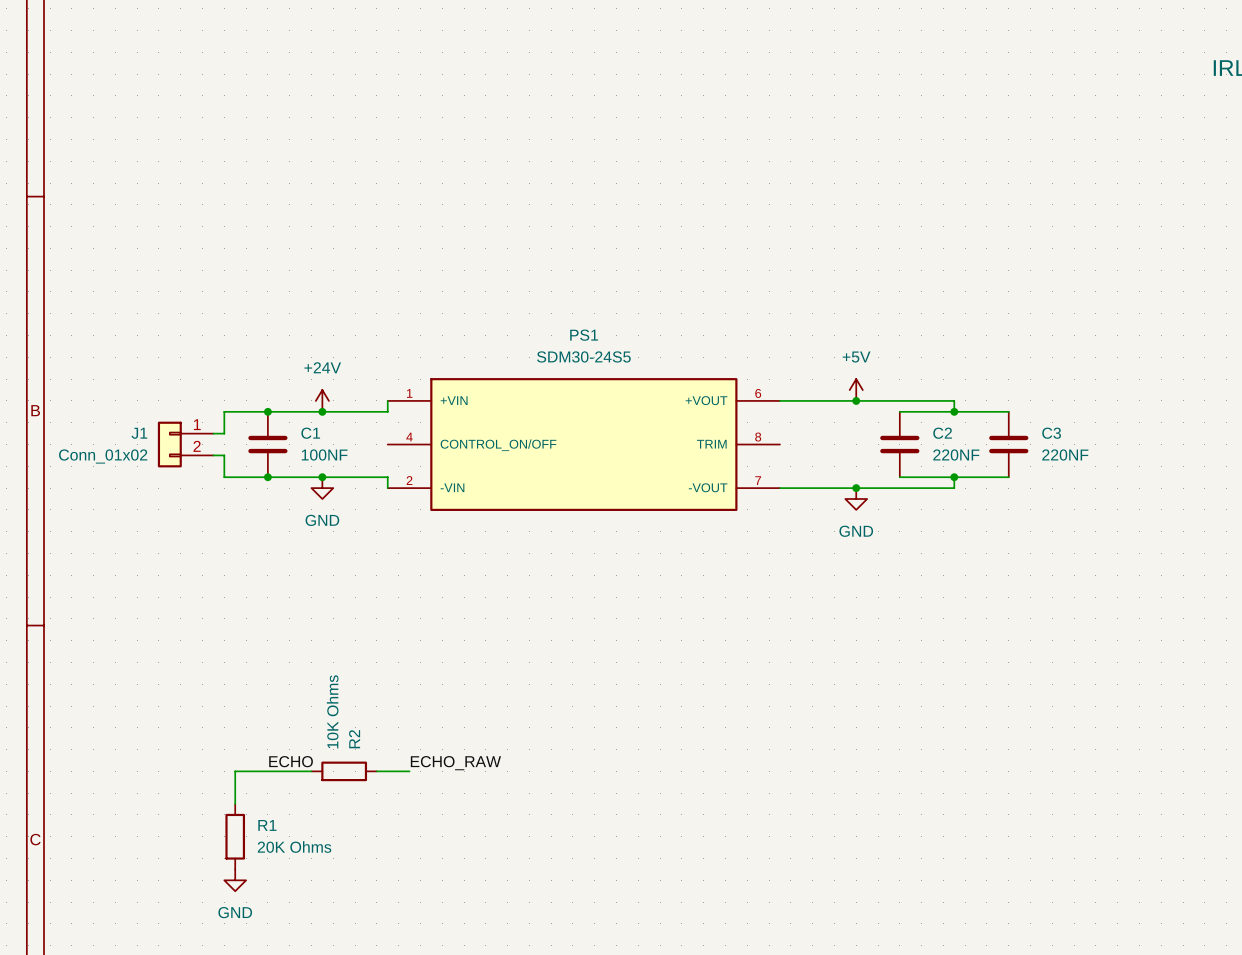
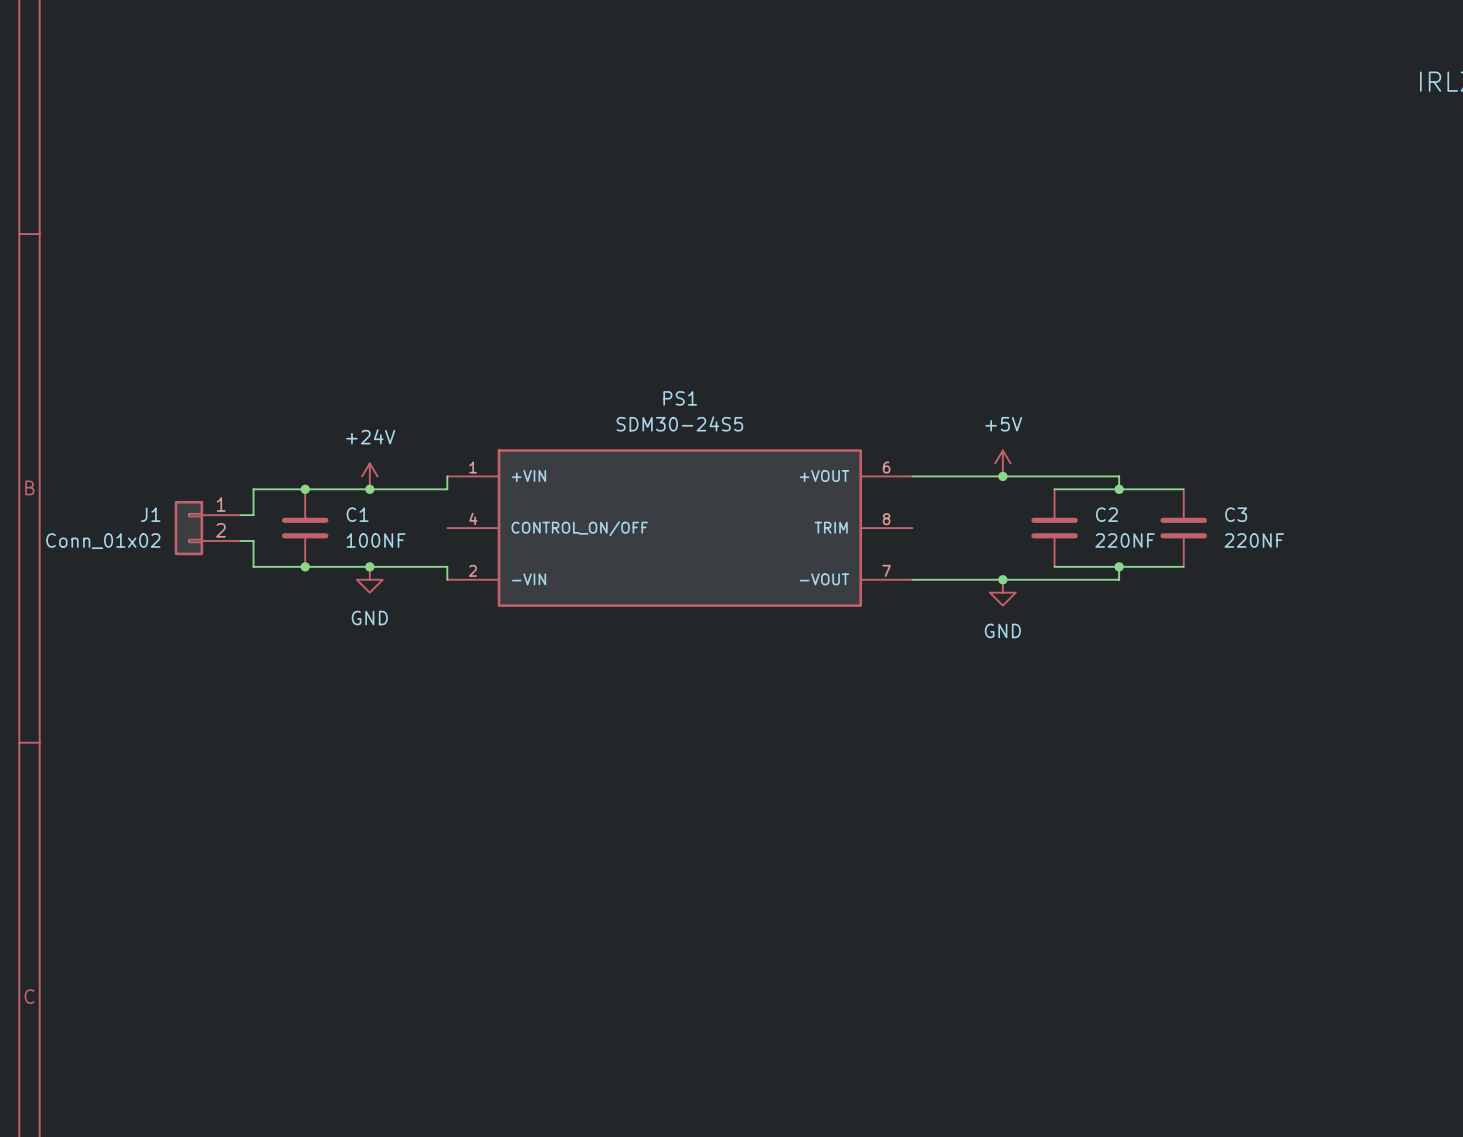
label: ECHO (291, 761) -> none
label: ECHO_RAW (455, 763) -> none
wire: (311, 771) (235, 771) (235, 804) -> none
R2: 10K Ohms (344, 771) -> none
wire: (376, 771) (409, 771) -> none
R1: 20K Ohms (235, 836) -> none
power symbol: GND (235, 880) -> none

